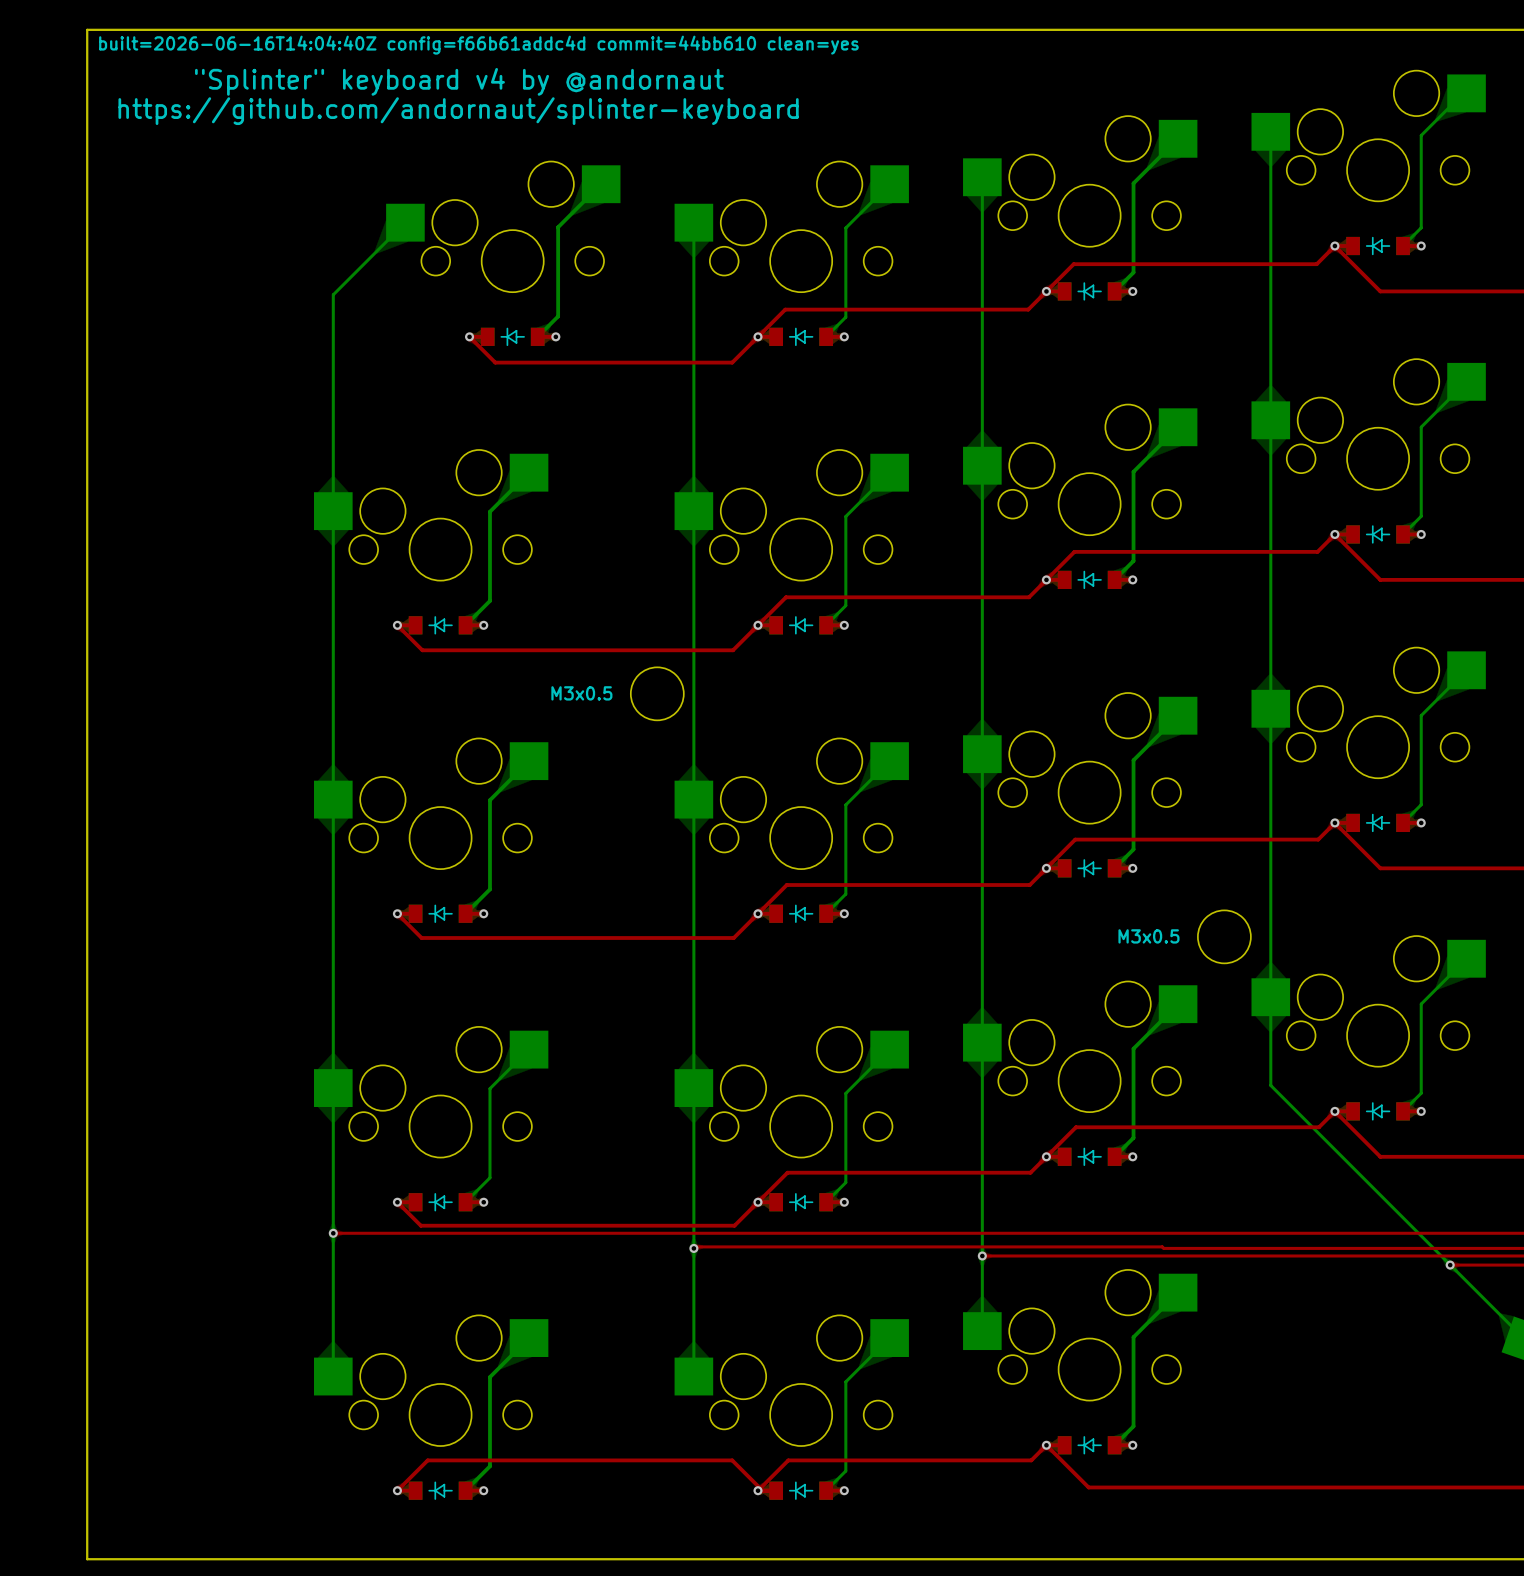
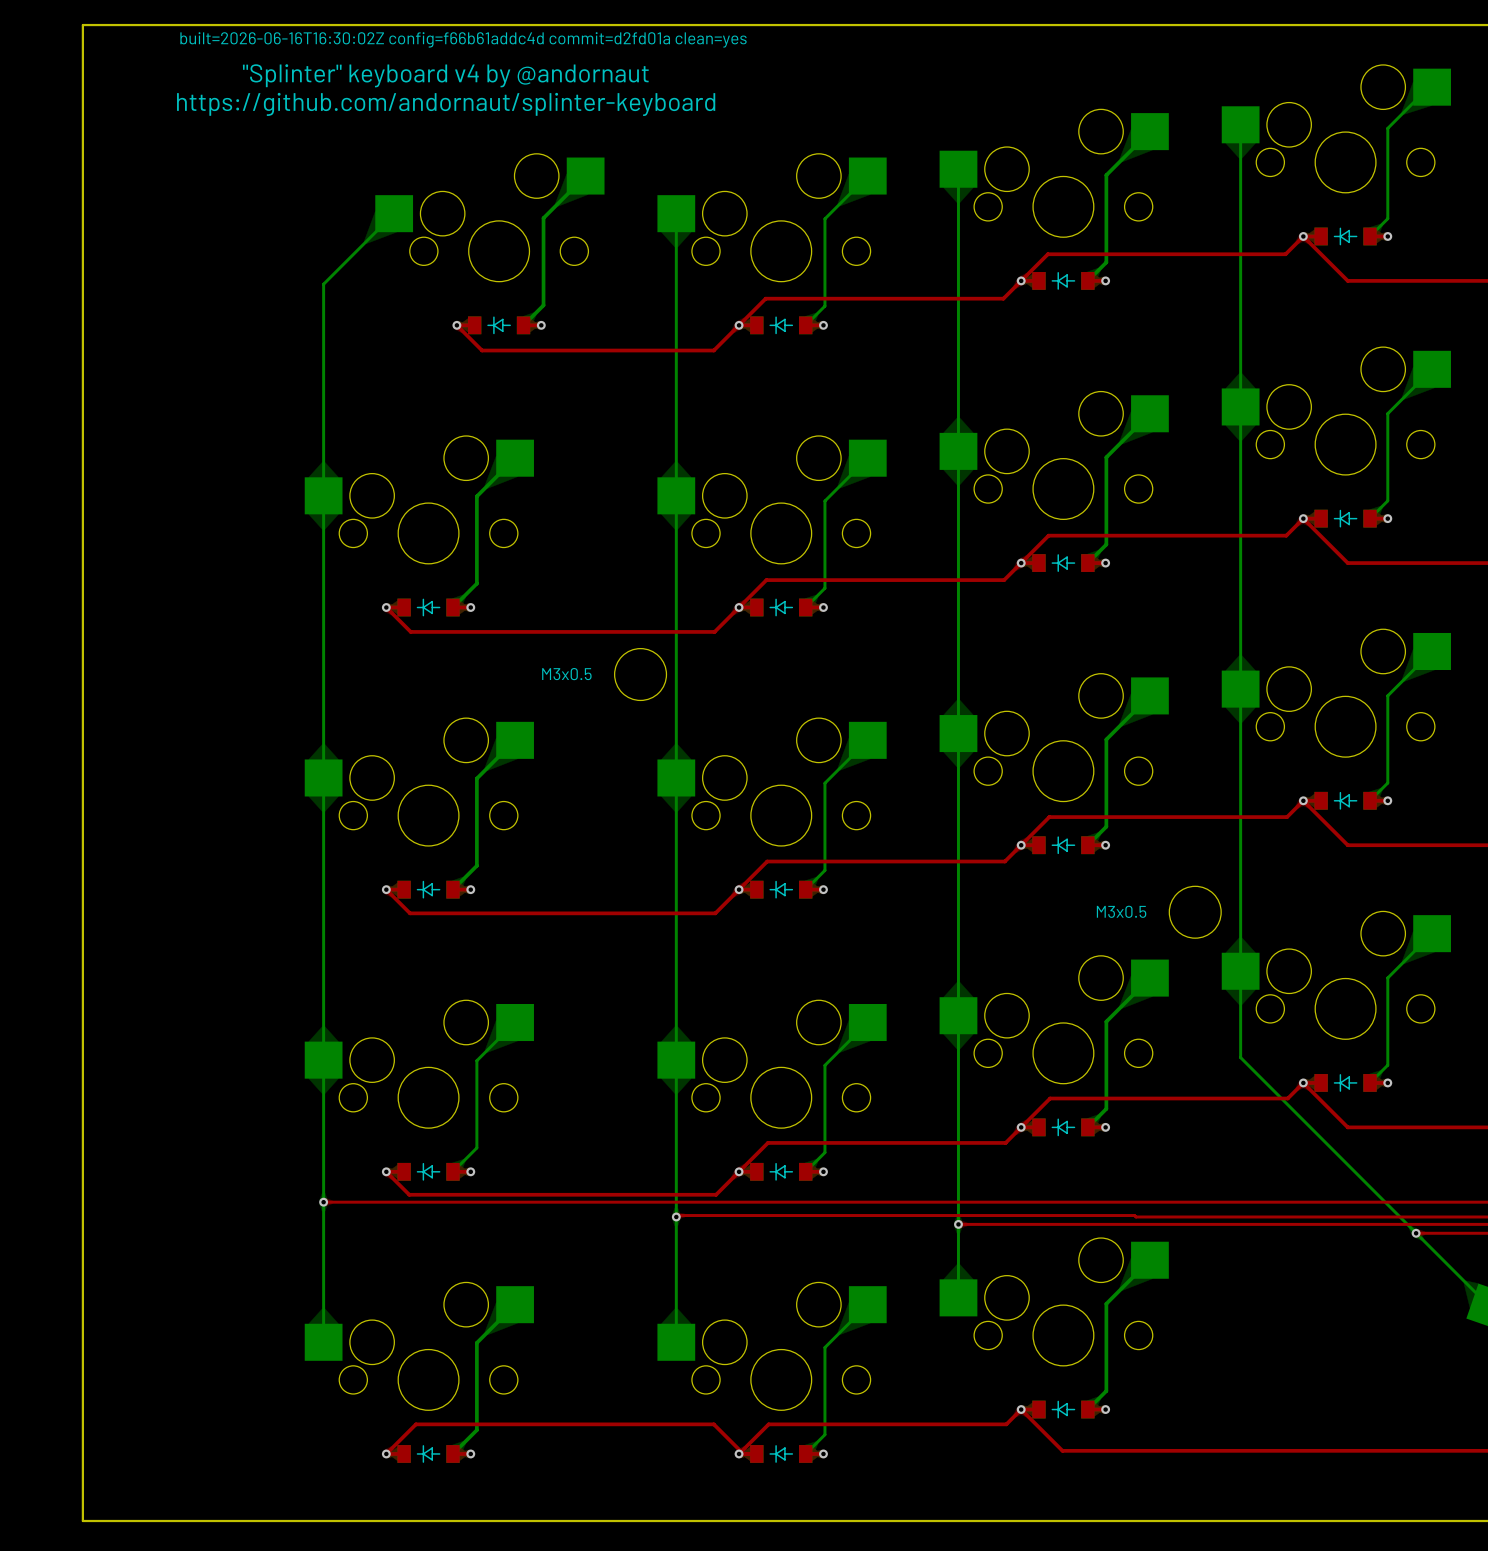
text: built=2026-06-16T14:04:40Z config=f66b61addc4d commit=44bb610 clean=yes (478, 45) -> built=2026-06-16T16:30:02Z config=f66b61addc4d commit=d2fd01a clean=yes (463, 39)

